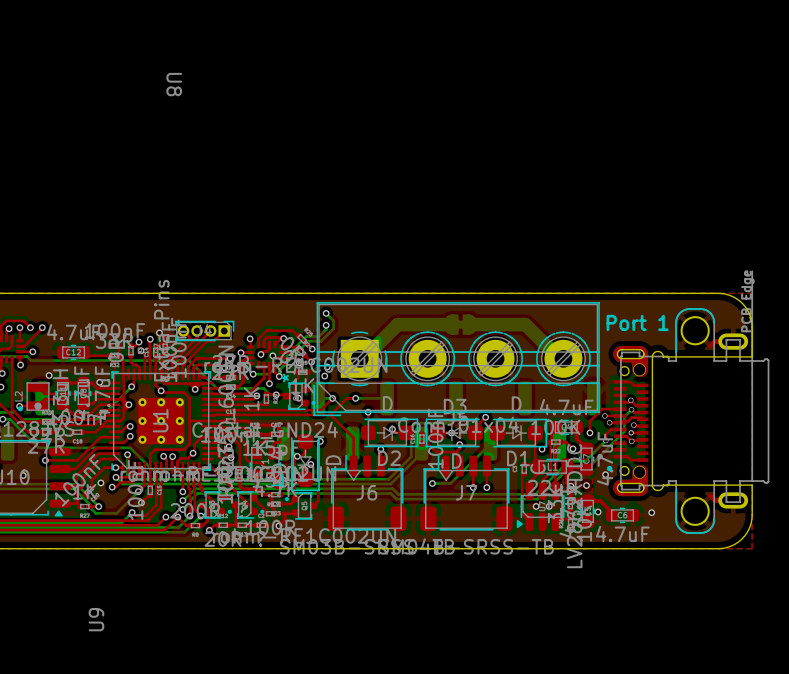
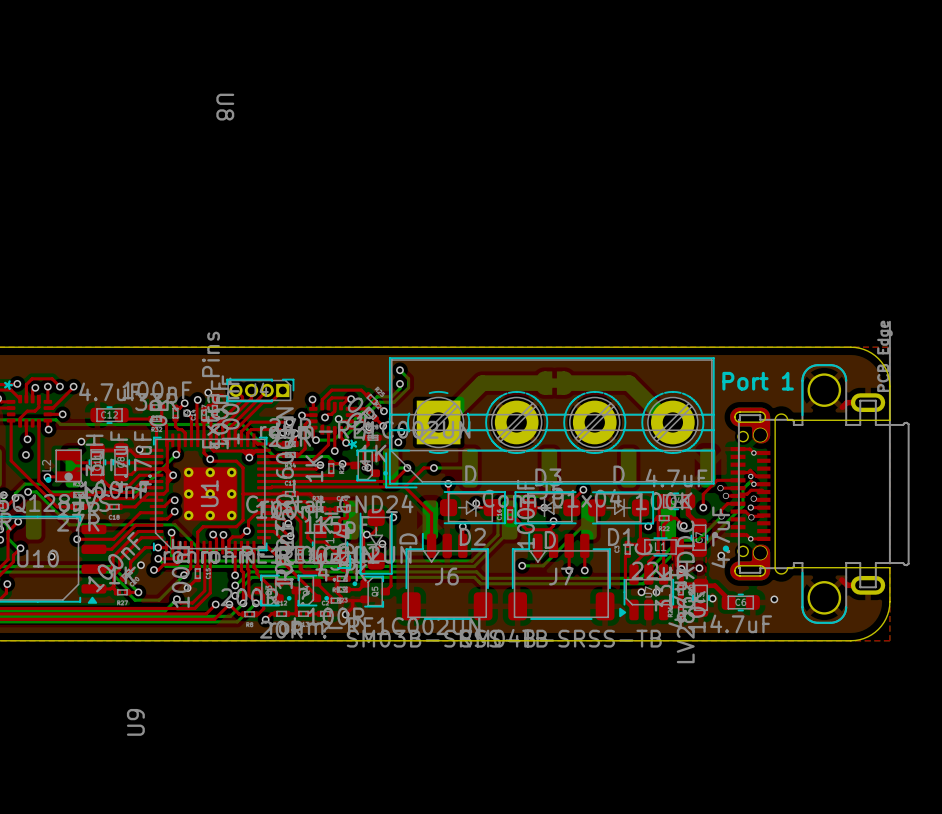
via: none -> (753, 453)
via: (630, 400) -> none
via: none -> (750, 476)
via: (631, 409) -> none
via: none -> (753, 484)
via: none -> (750, 538)

